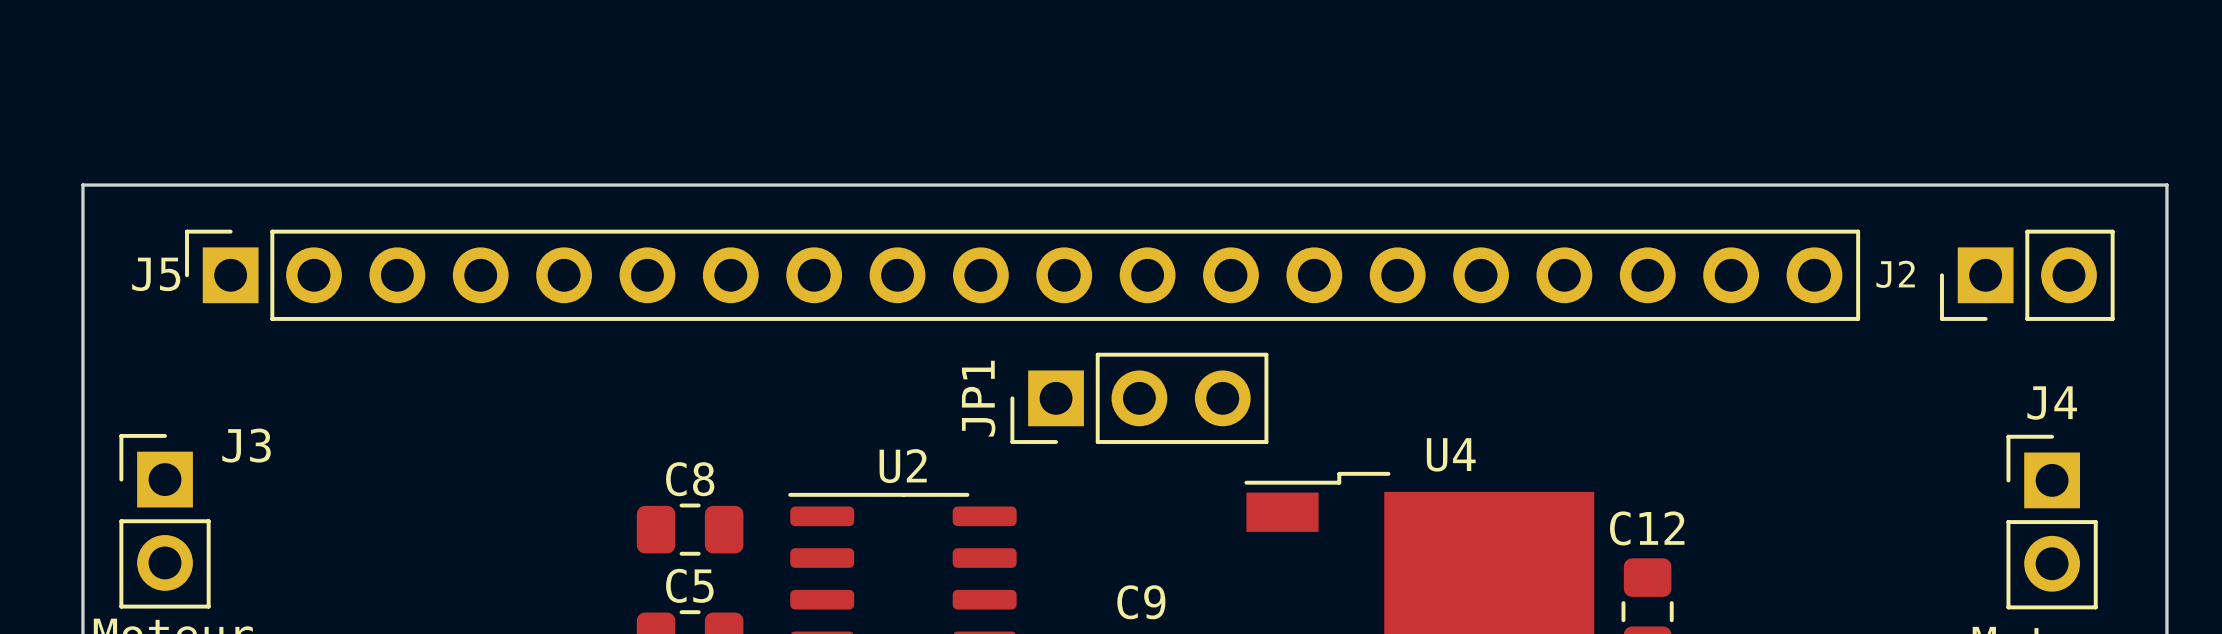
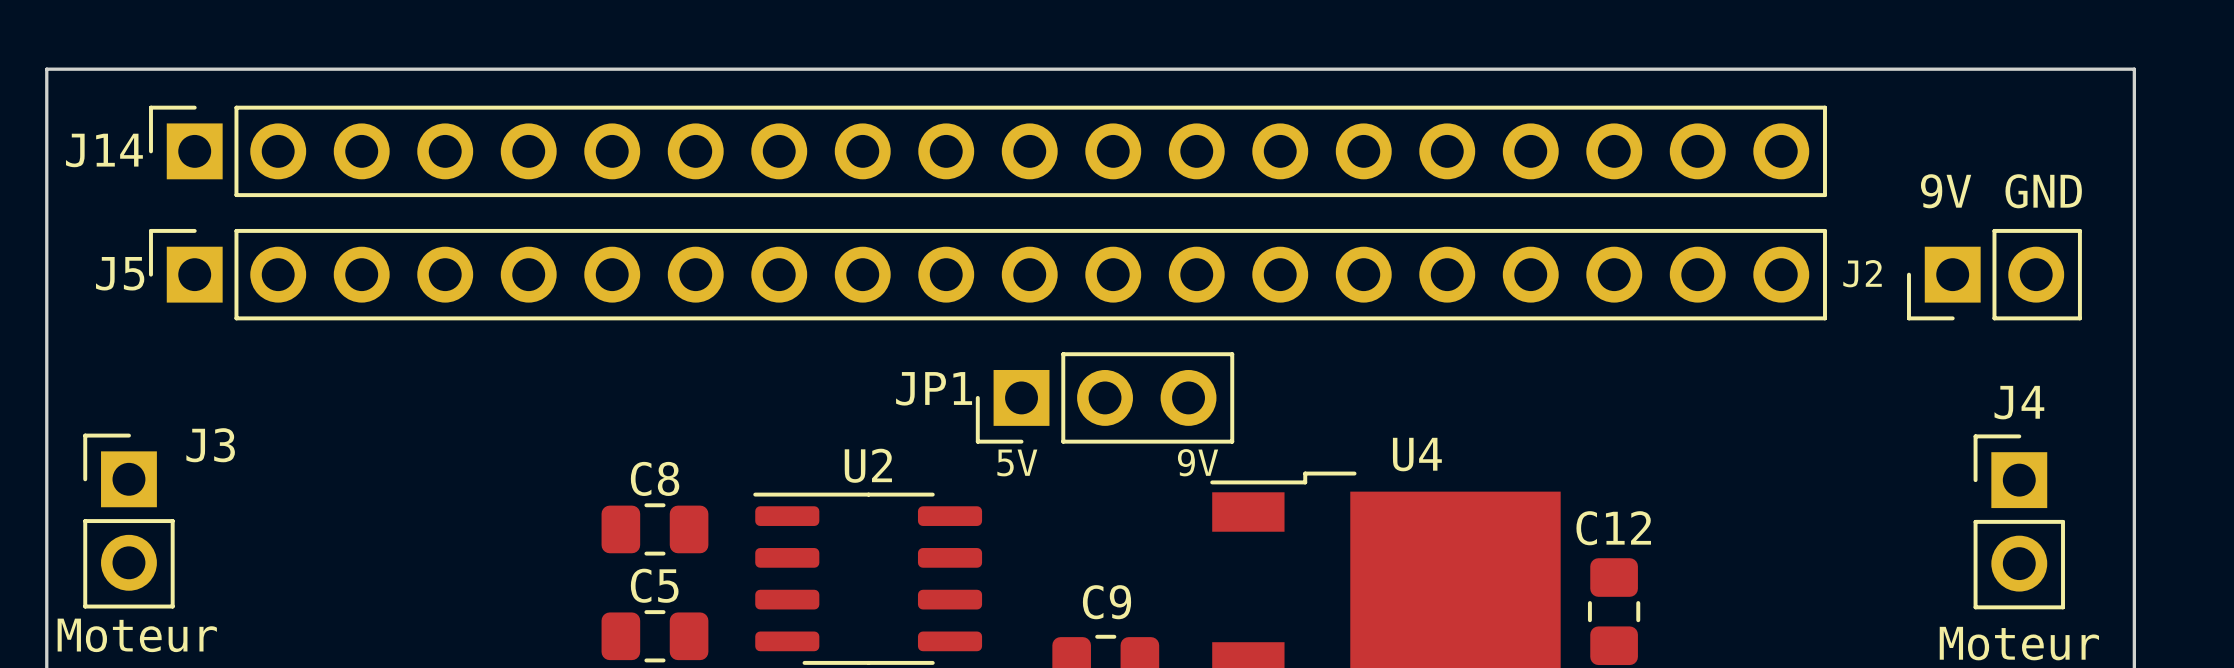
J14: none -> (987, 151)
board edge: (82, 185) (2166, 185) -> (46, 184) (46, 69) (2134, 69) (2134, 184)
text: none -> 9V (1946, 191)
text: none -> GND (2043, 191)
JP1 name rotation: 0° (978, 398) -> 90° clockwise (934, 388)
text: none -> 5V (1017, 462)
text: none -> 9V (1198, 462)

